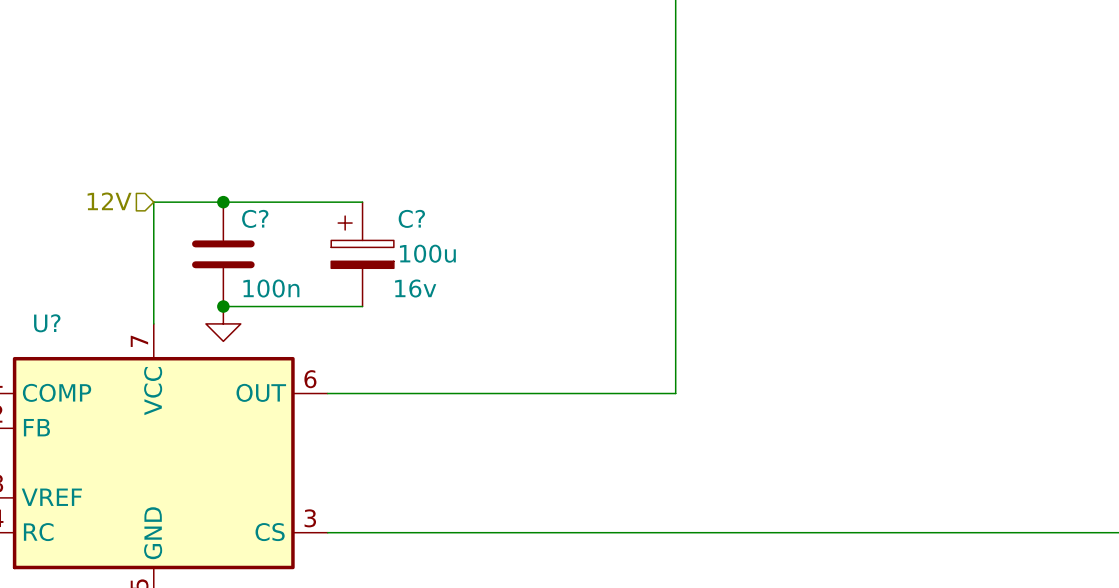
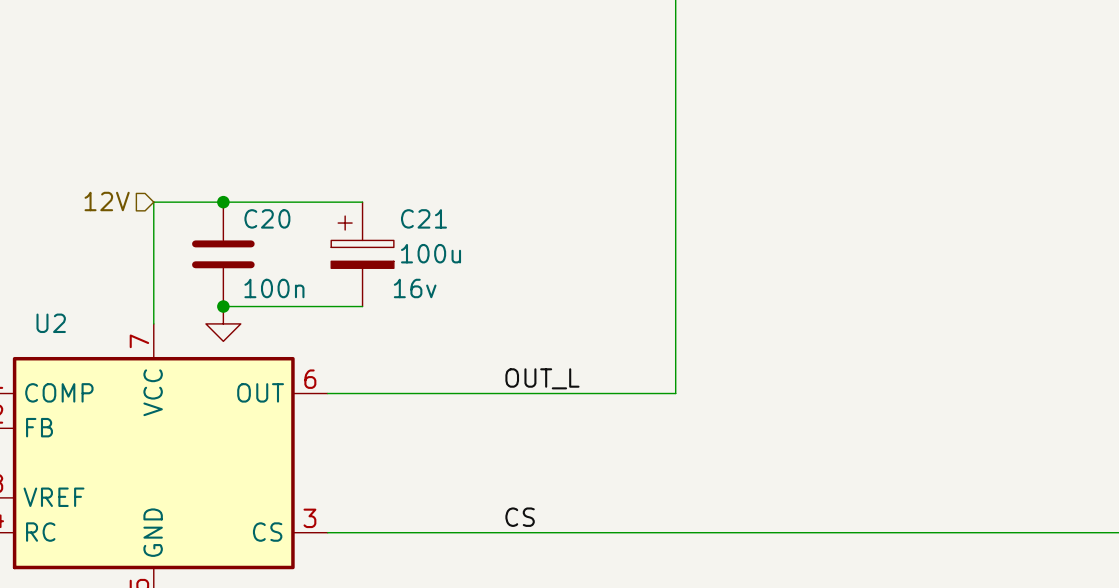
C? name: C? (255, 218) -> C20 (267, 218)
C? name: C? (411, 218) -> C21 (423, 218)
U? name: U? (47, 323) -> U2 (51, 323)
label: none -> OUT_L (542, 378)
label: none -> CS (520, 517)

